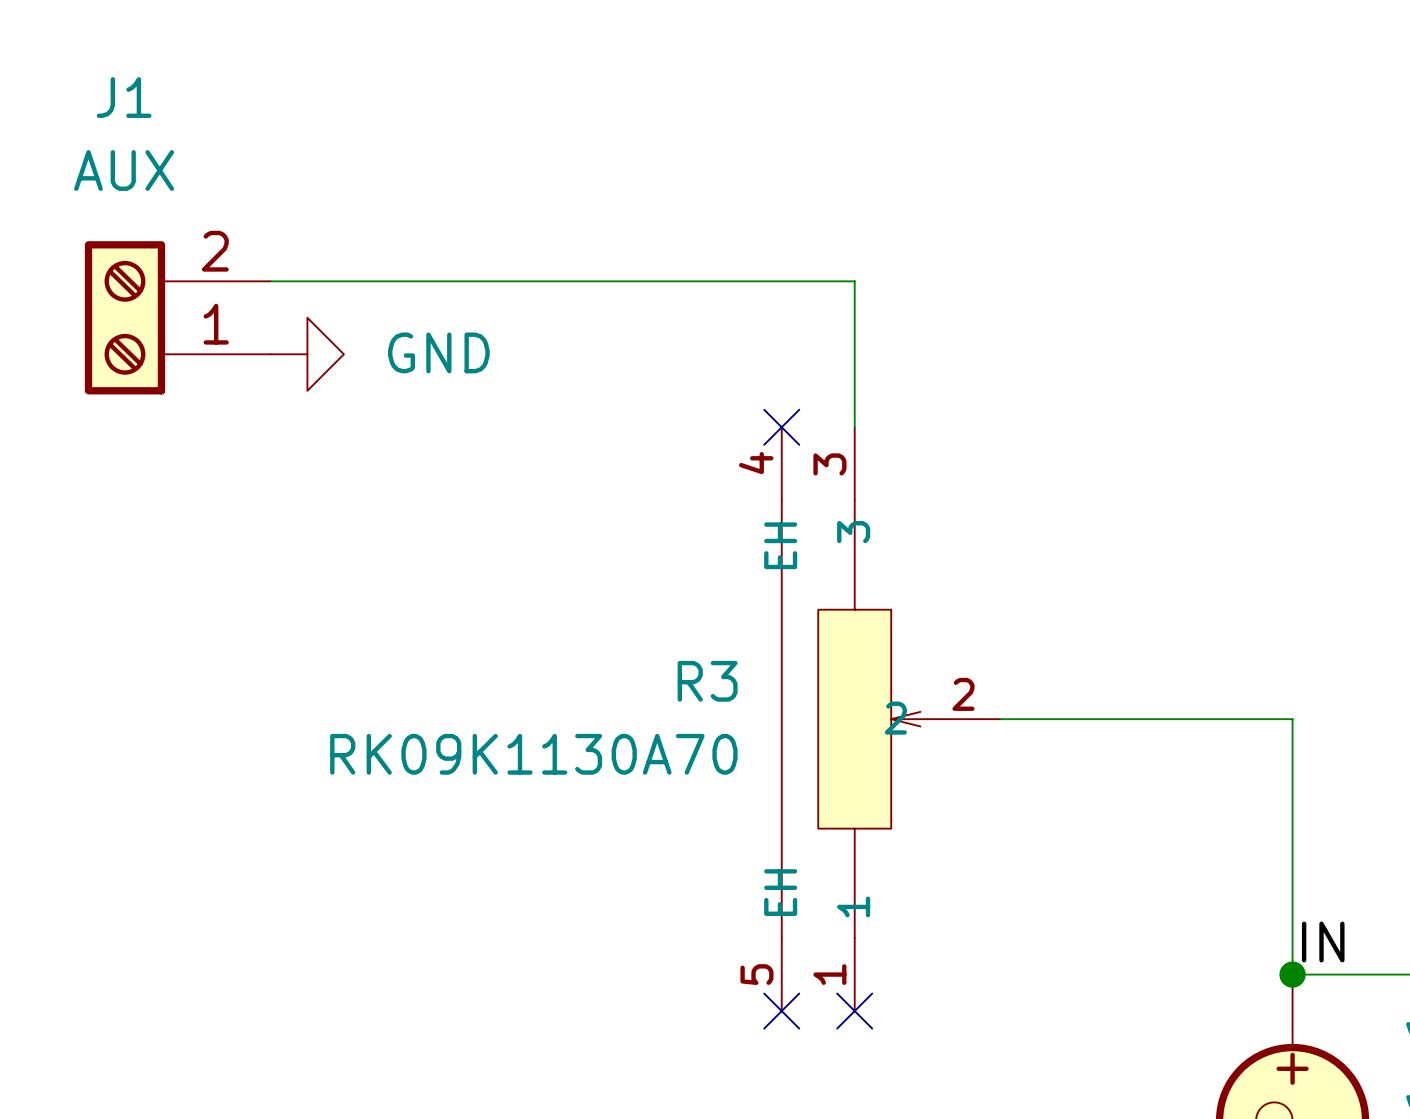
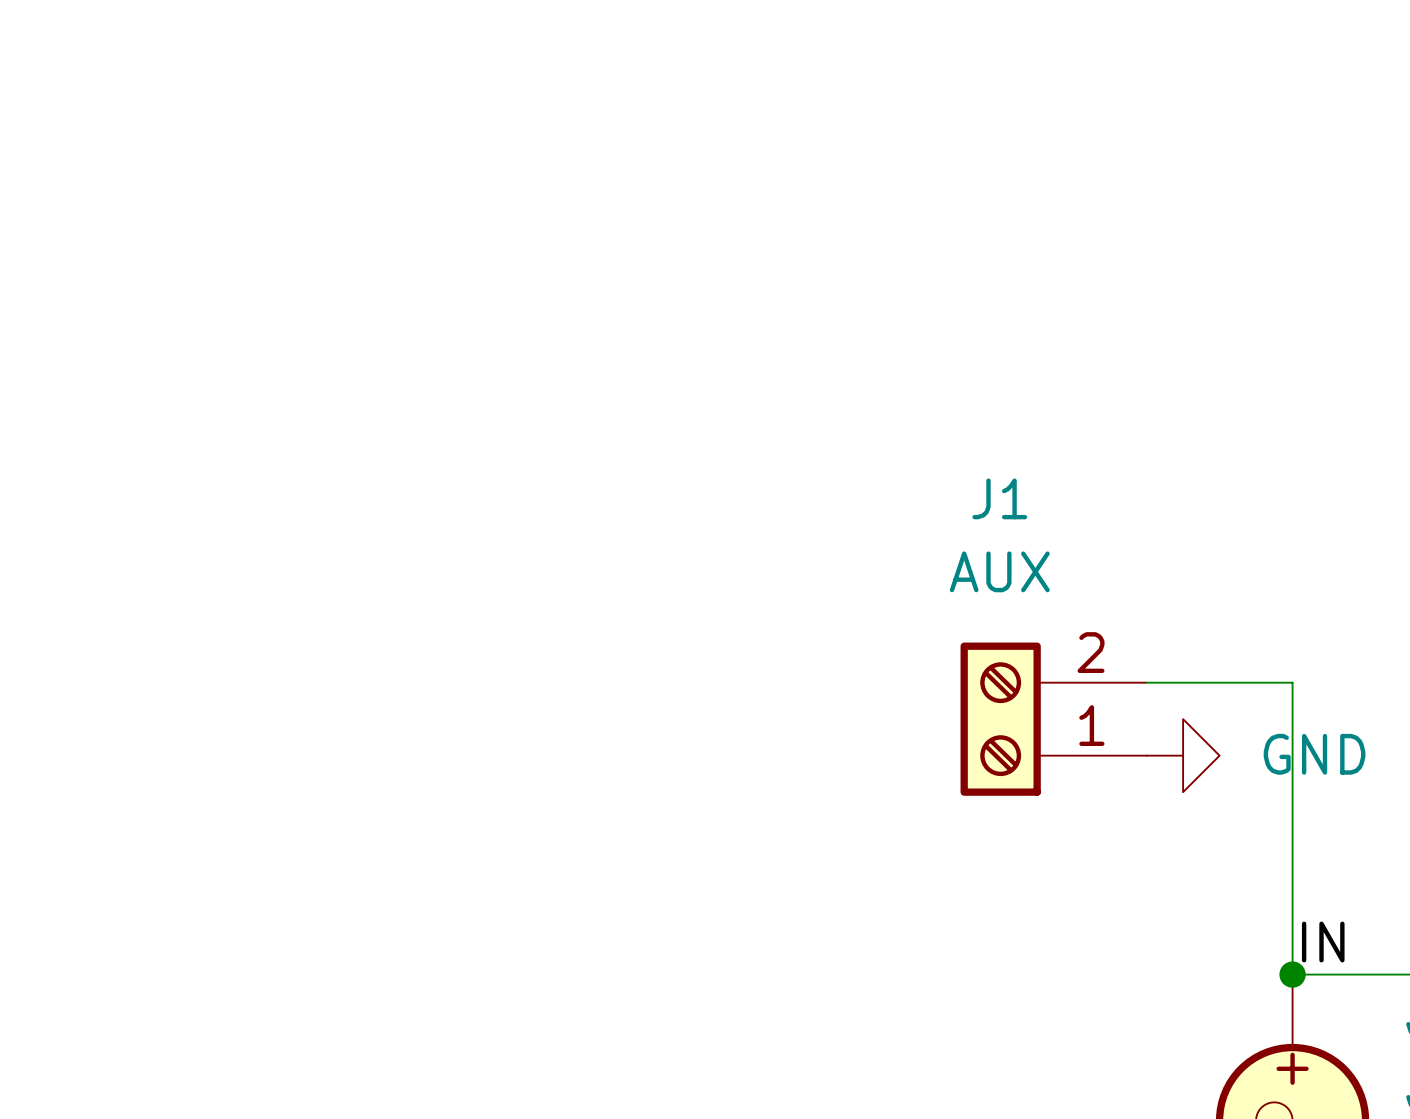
wire: (270, 281) (854, 281) (854, 427) -> none
J1 position: (177, 317) -> (1053, 719)
power symbol: GND (307, 354) -> none
no-connect mark: (781, 427) -> none
R3: RK09K1130A70 (891, 719) -> none
wire: (1000, 719) (1292, 719) -> (1146, 682) (1292, 682) (1292, 719)
power symbol: none -> GND (1183, 755)
no-connect mark: (781, 1011) -> none
no-connect mark: (854, 1011) -> none

